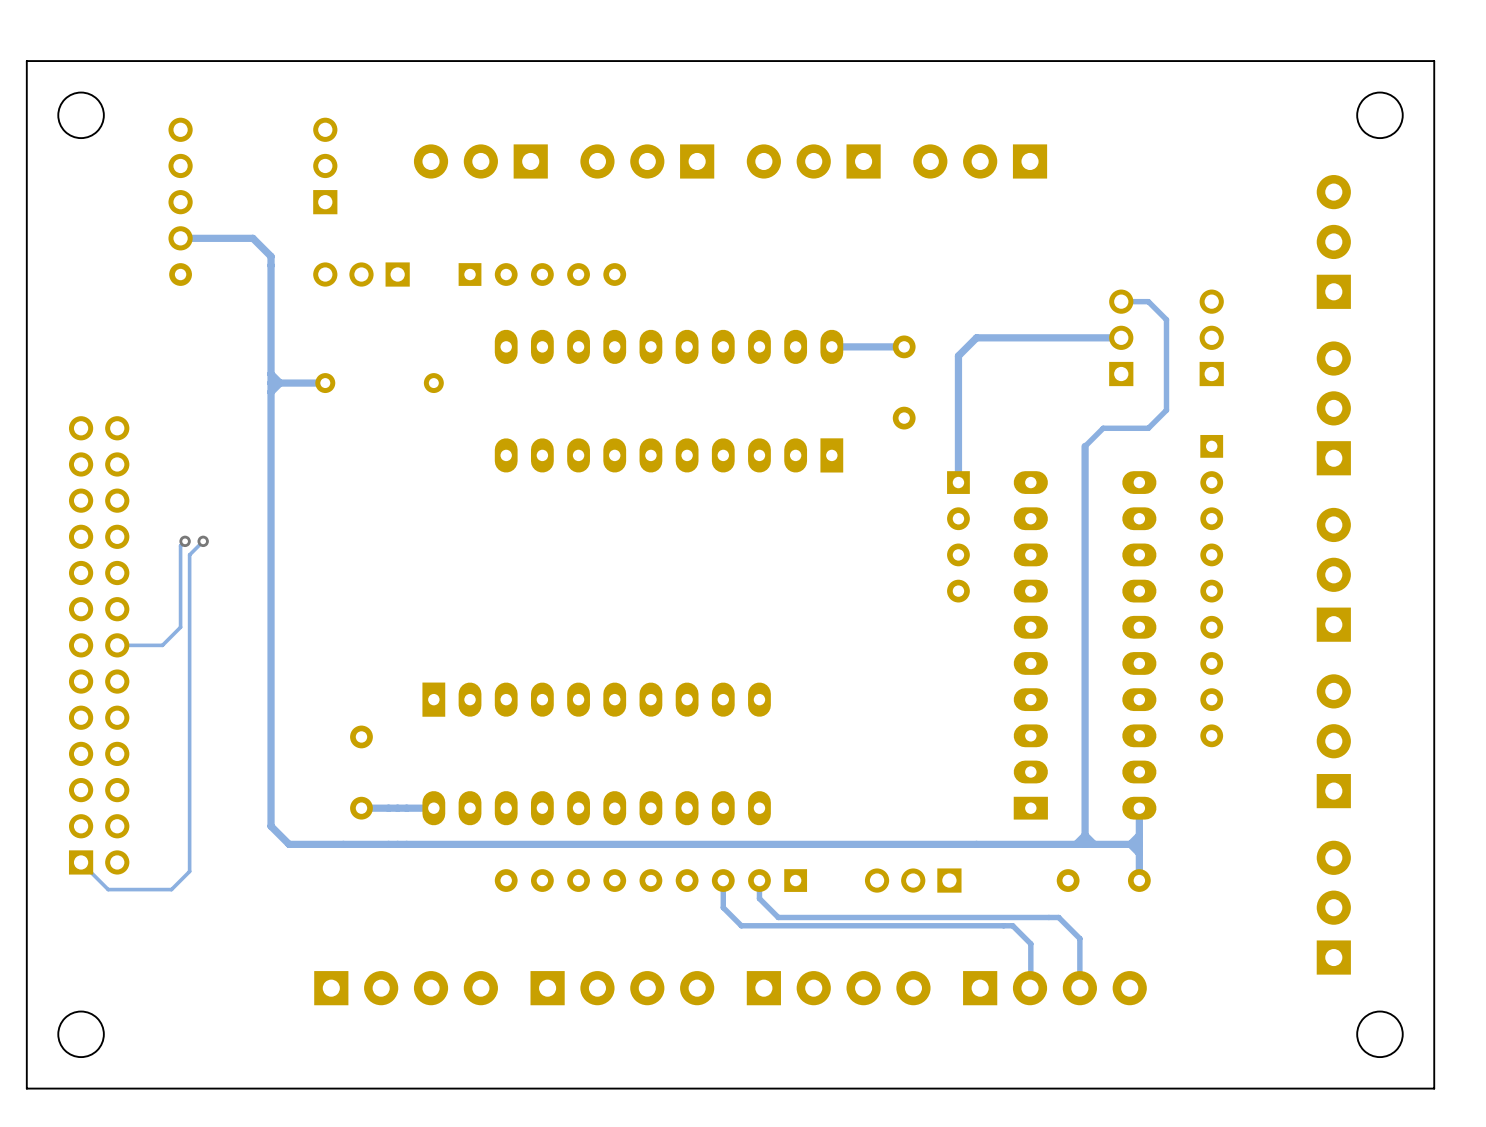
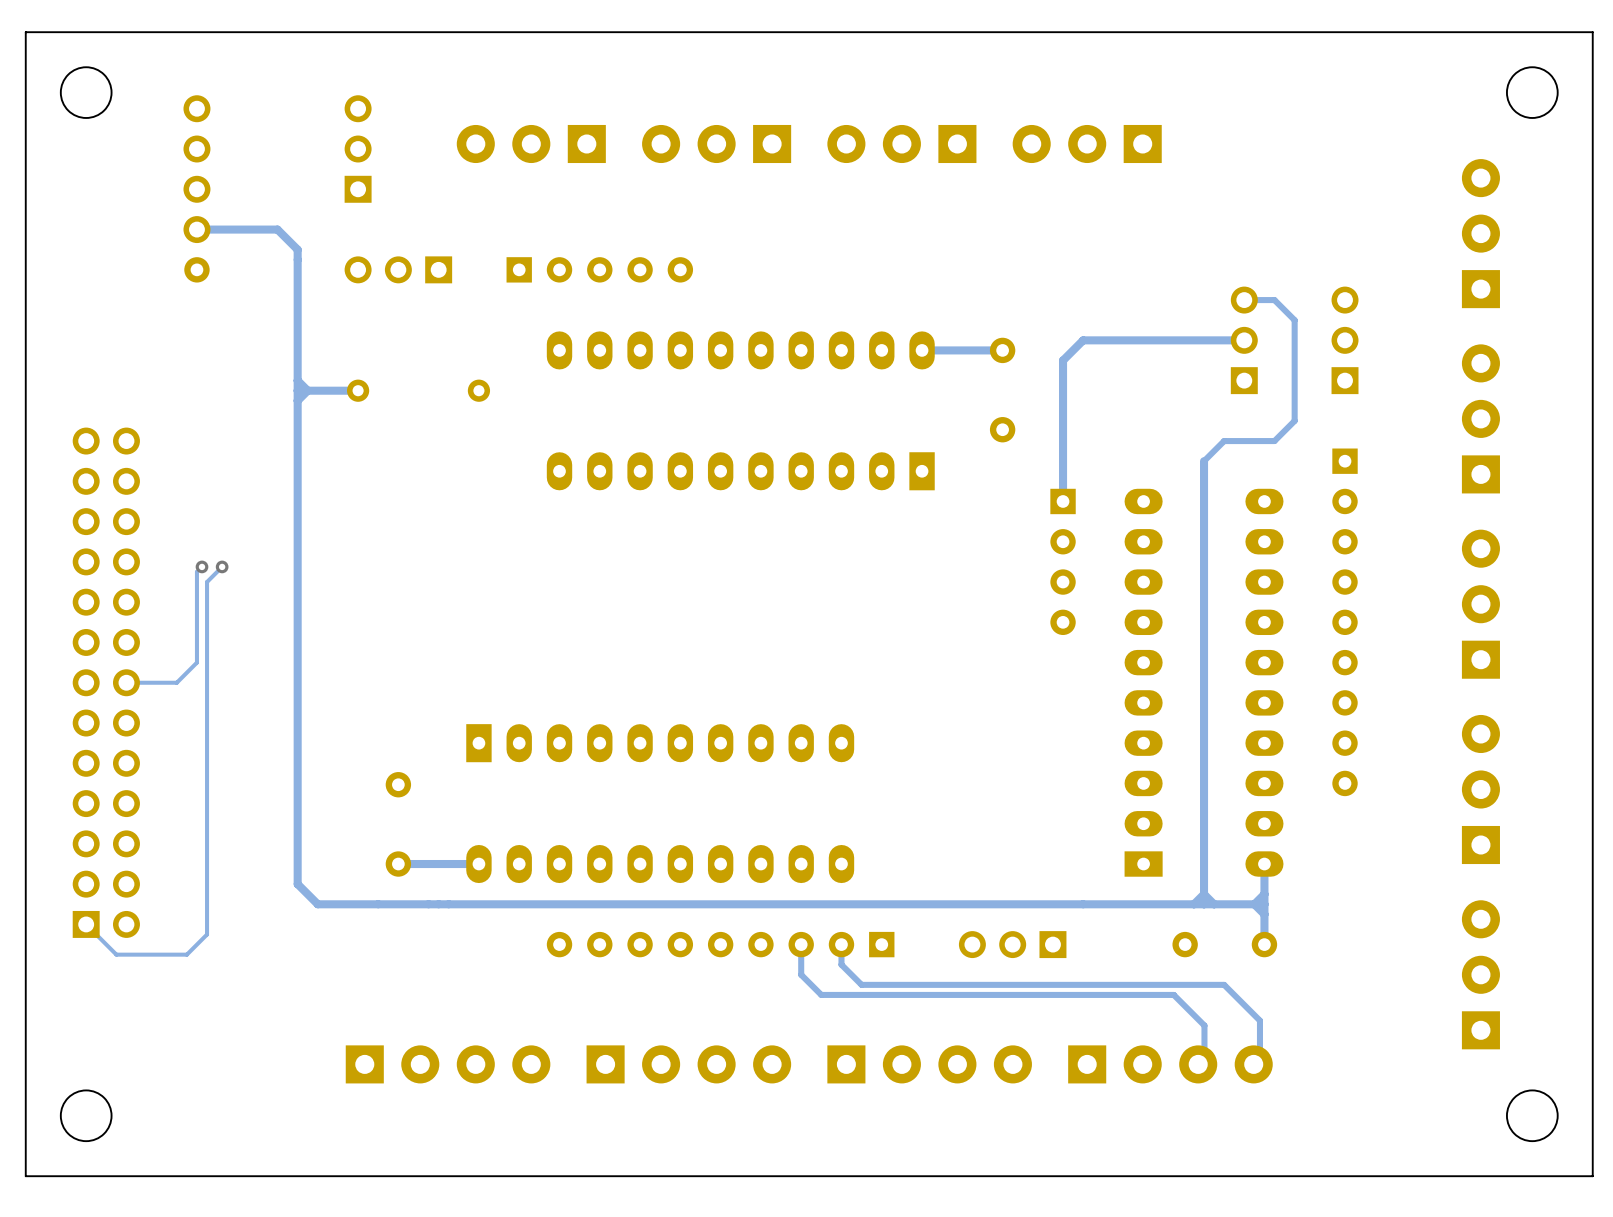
track: (777, 916) (1058, 917) (1079, 938) (1079, 988) -> (861, 984) (1224, 984) (1259, 1020) (1259, 1064)
track: (1012, 925) (1030, 943) (1030, 988) -> (1123, 994) (1173, 994) (1204, 1025) (1204, 1064)

